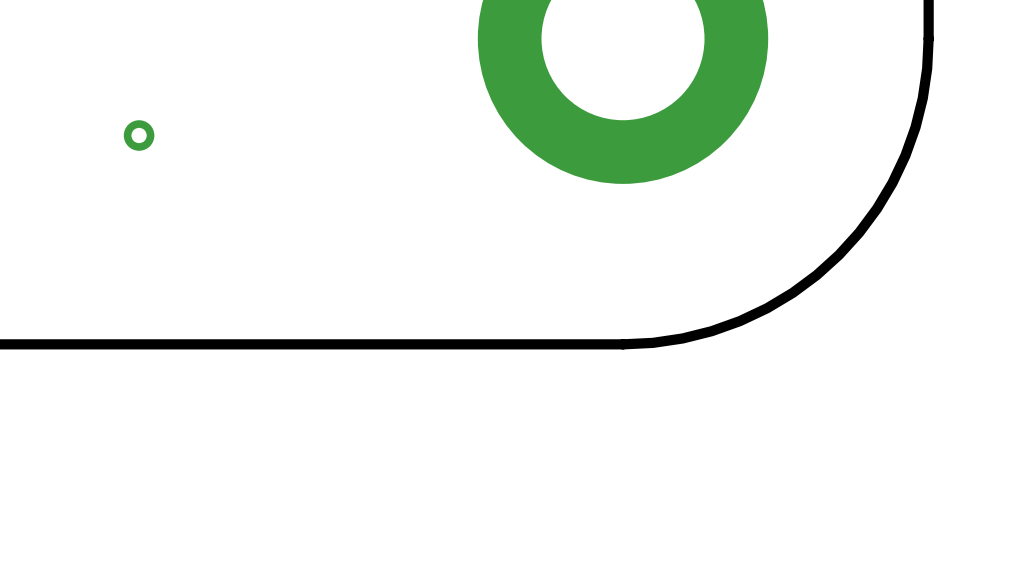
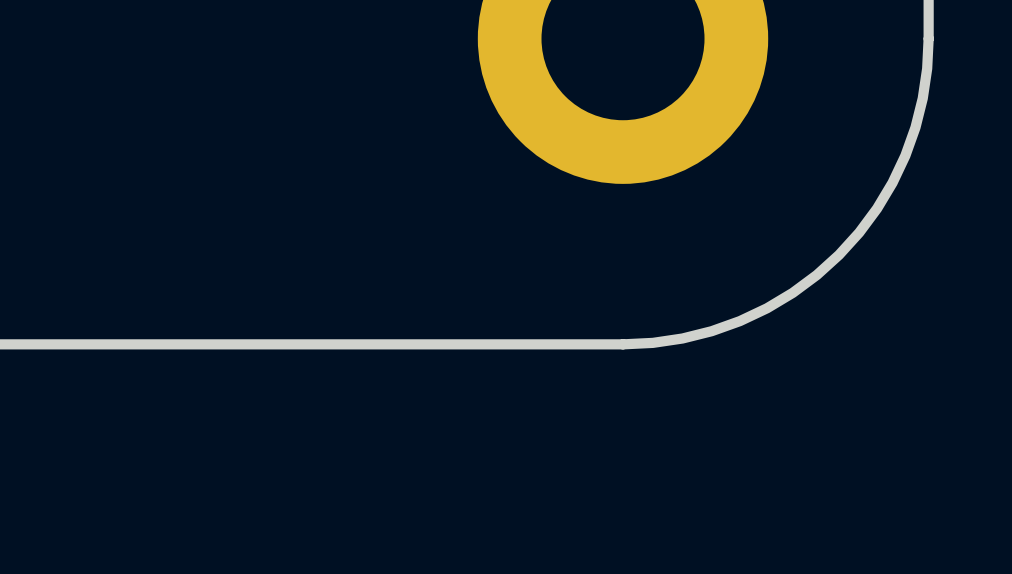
via: (139, 135) -> none

